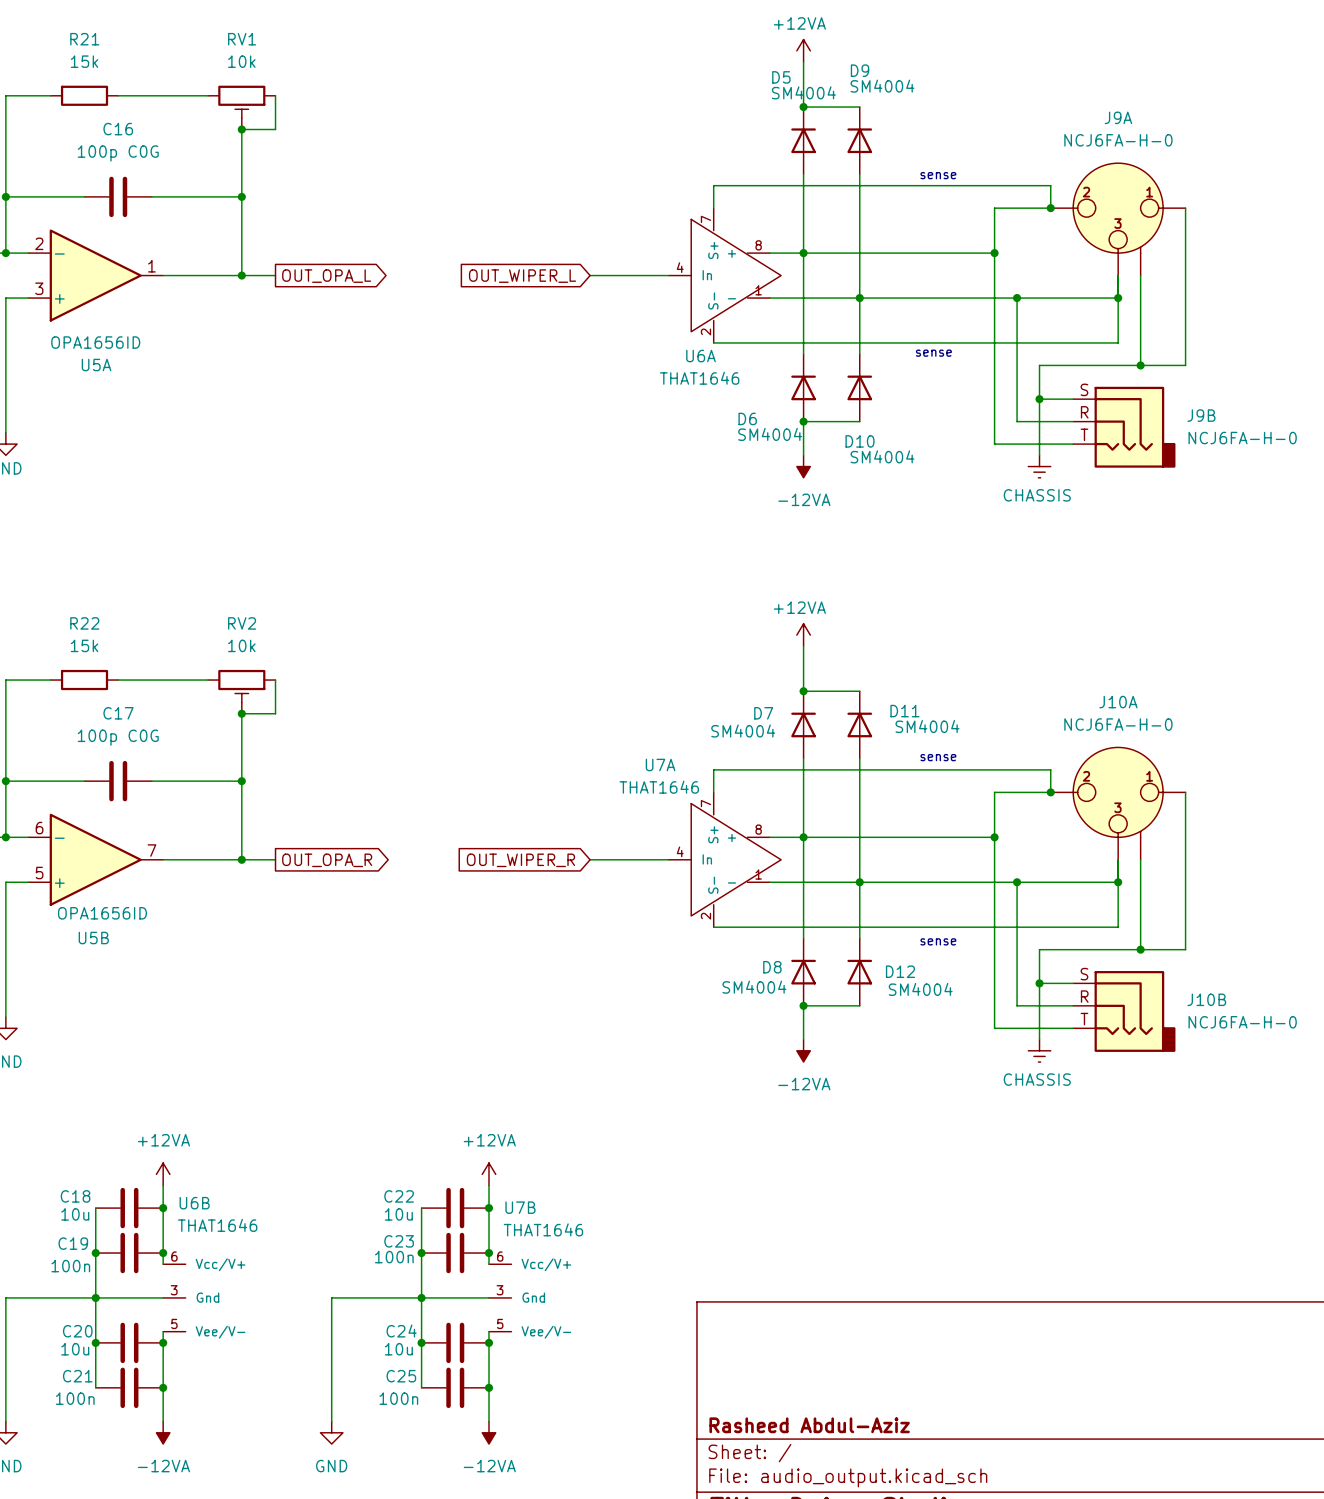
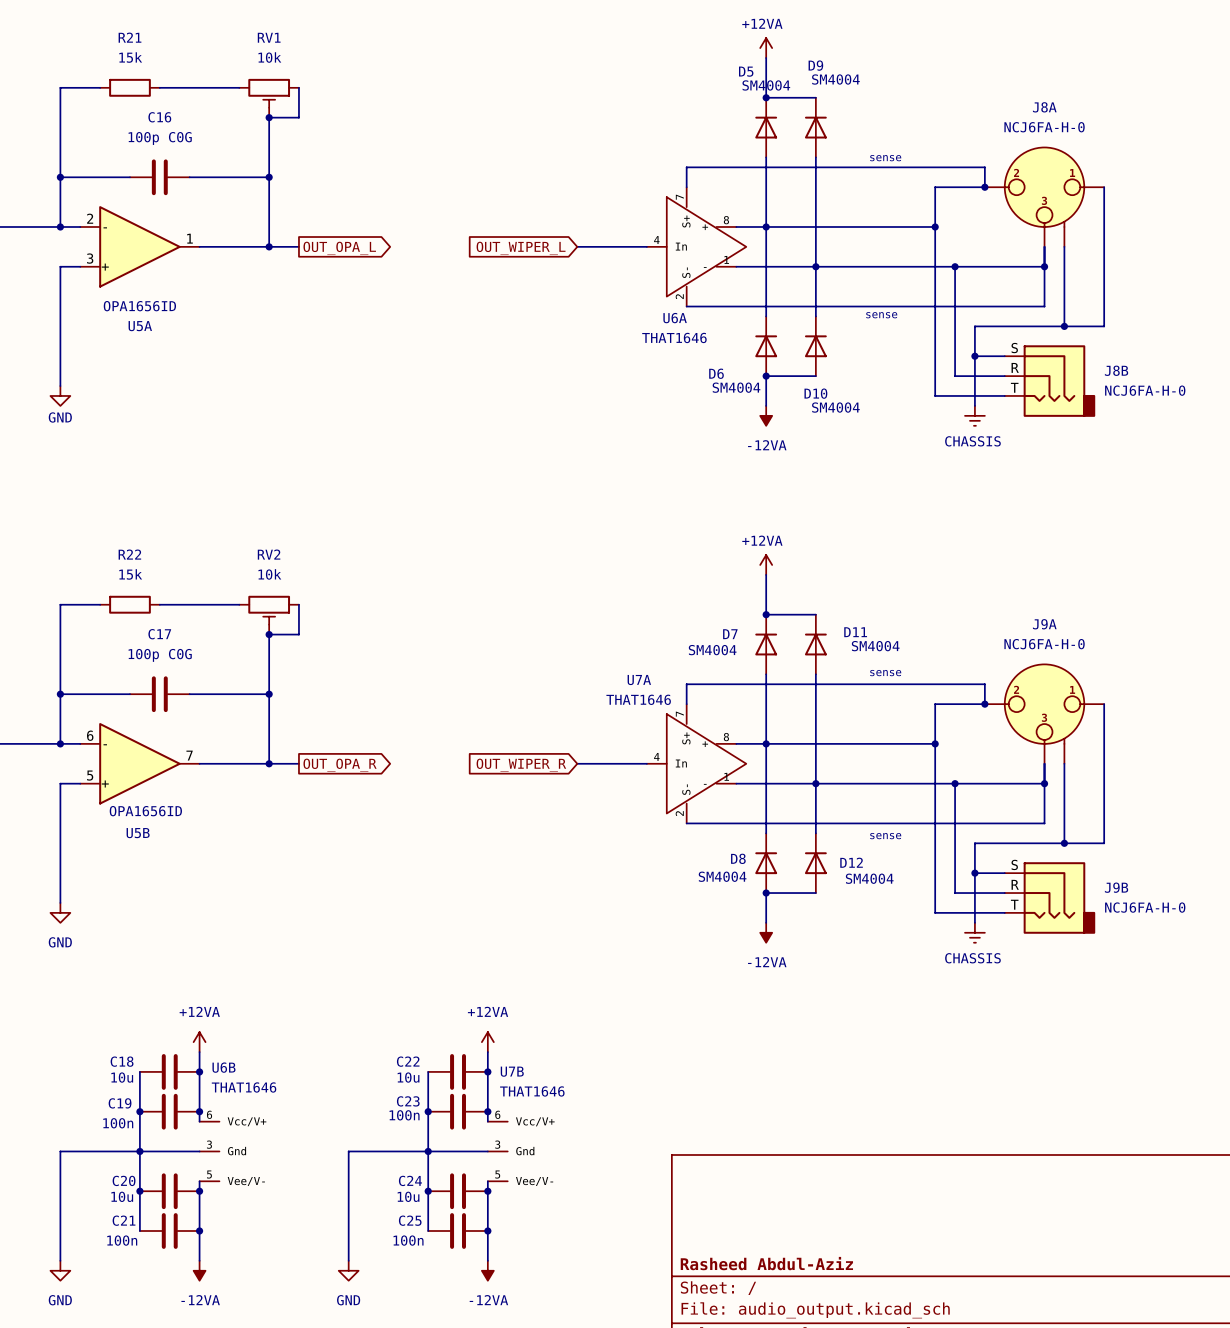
J9A name: J9A (1118, 117) -> J8A (1044, 107)
J9B name: J9B (1201, 415) -> J8B (1116, 370)
J10A name: J10A (1118, 702) -> J9A (1044, 624)
J10B name: J10B (1206, 999) -> J9B (1116, 887)

